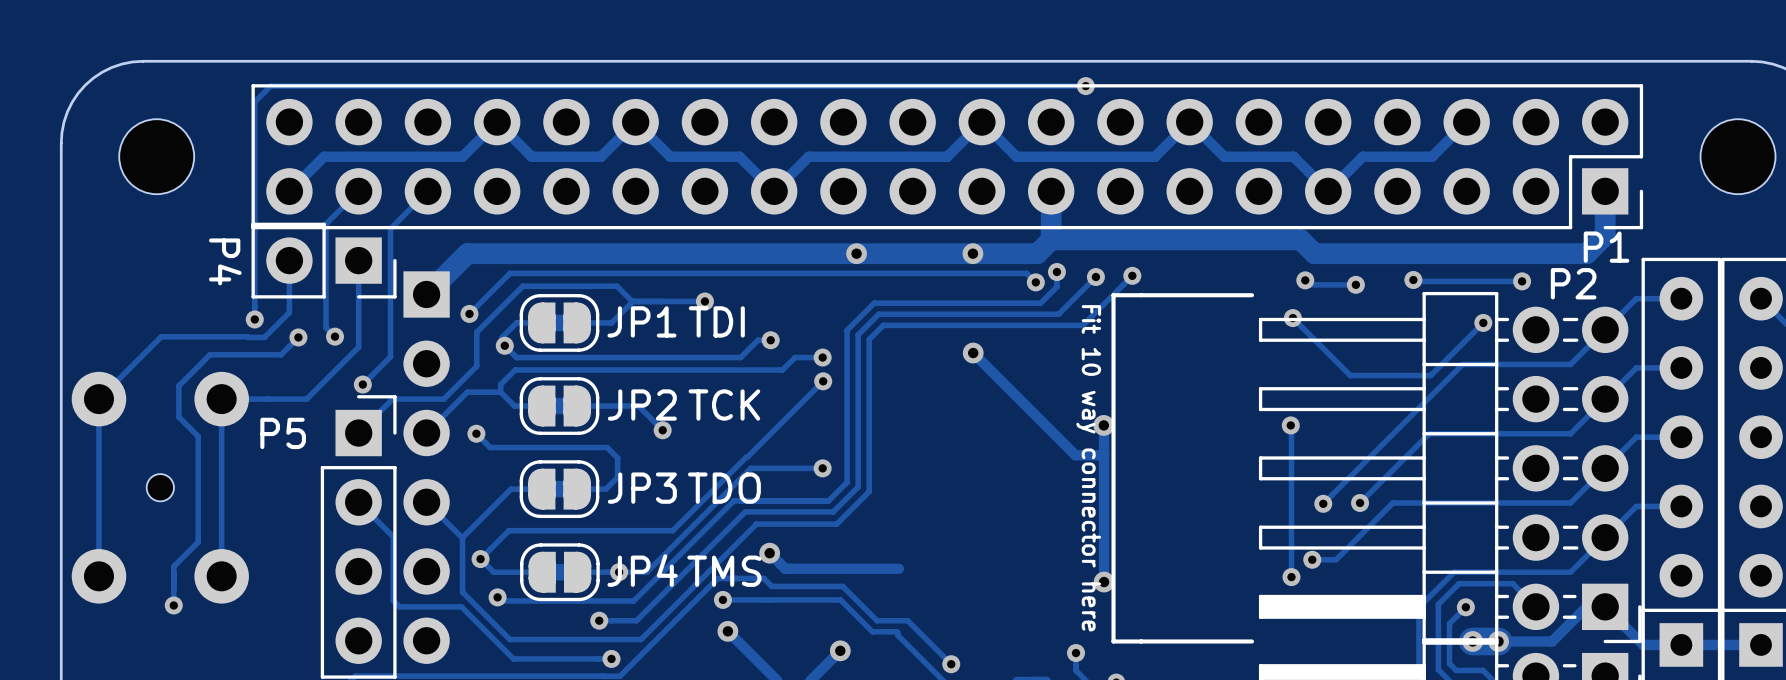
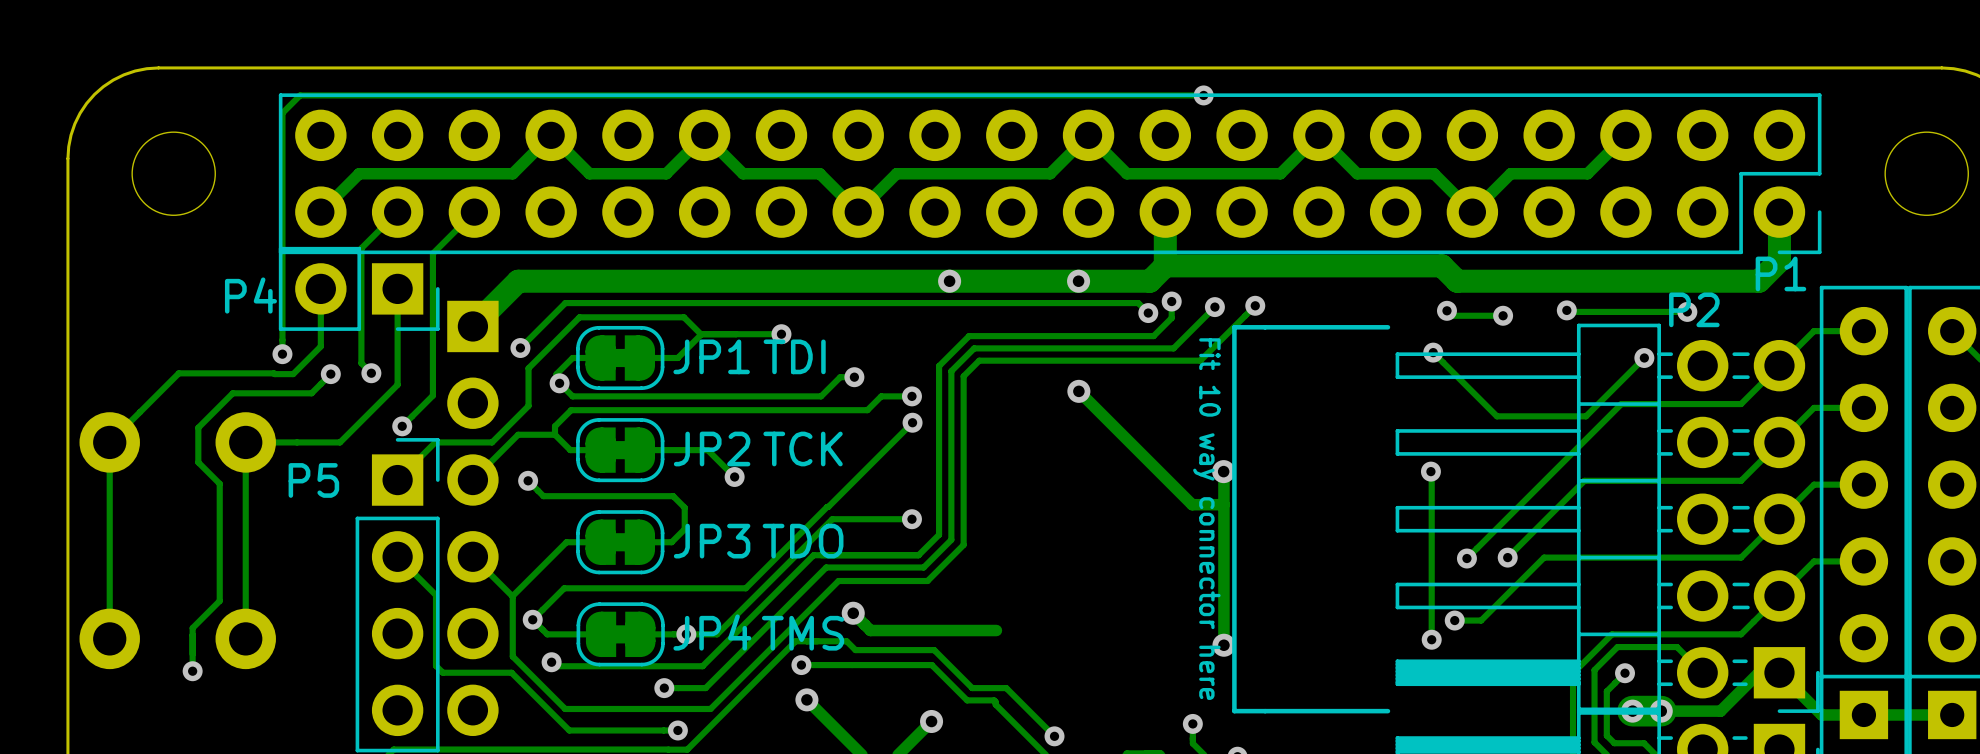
P1 footprint: [251, 84, 1644, 230] -> [278, 93, 1822, 255]
P4 name rotation: 0° (225, 261) -> 90° counterclockwise (250, 295)
P2 name position: P2 (1573, 283) -> P2 (1694, 309)
part: (160, 487) -> none

